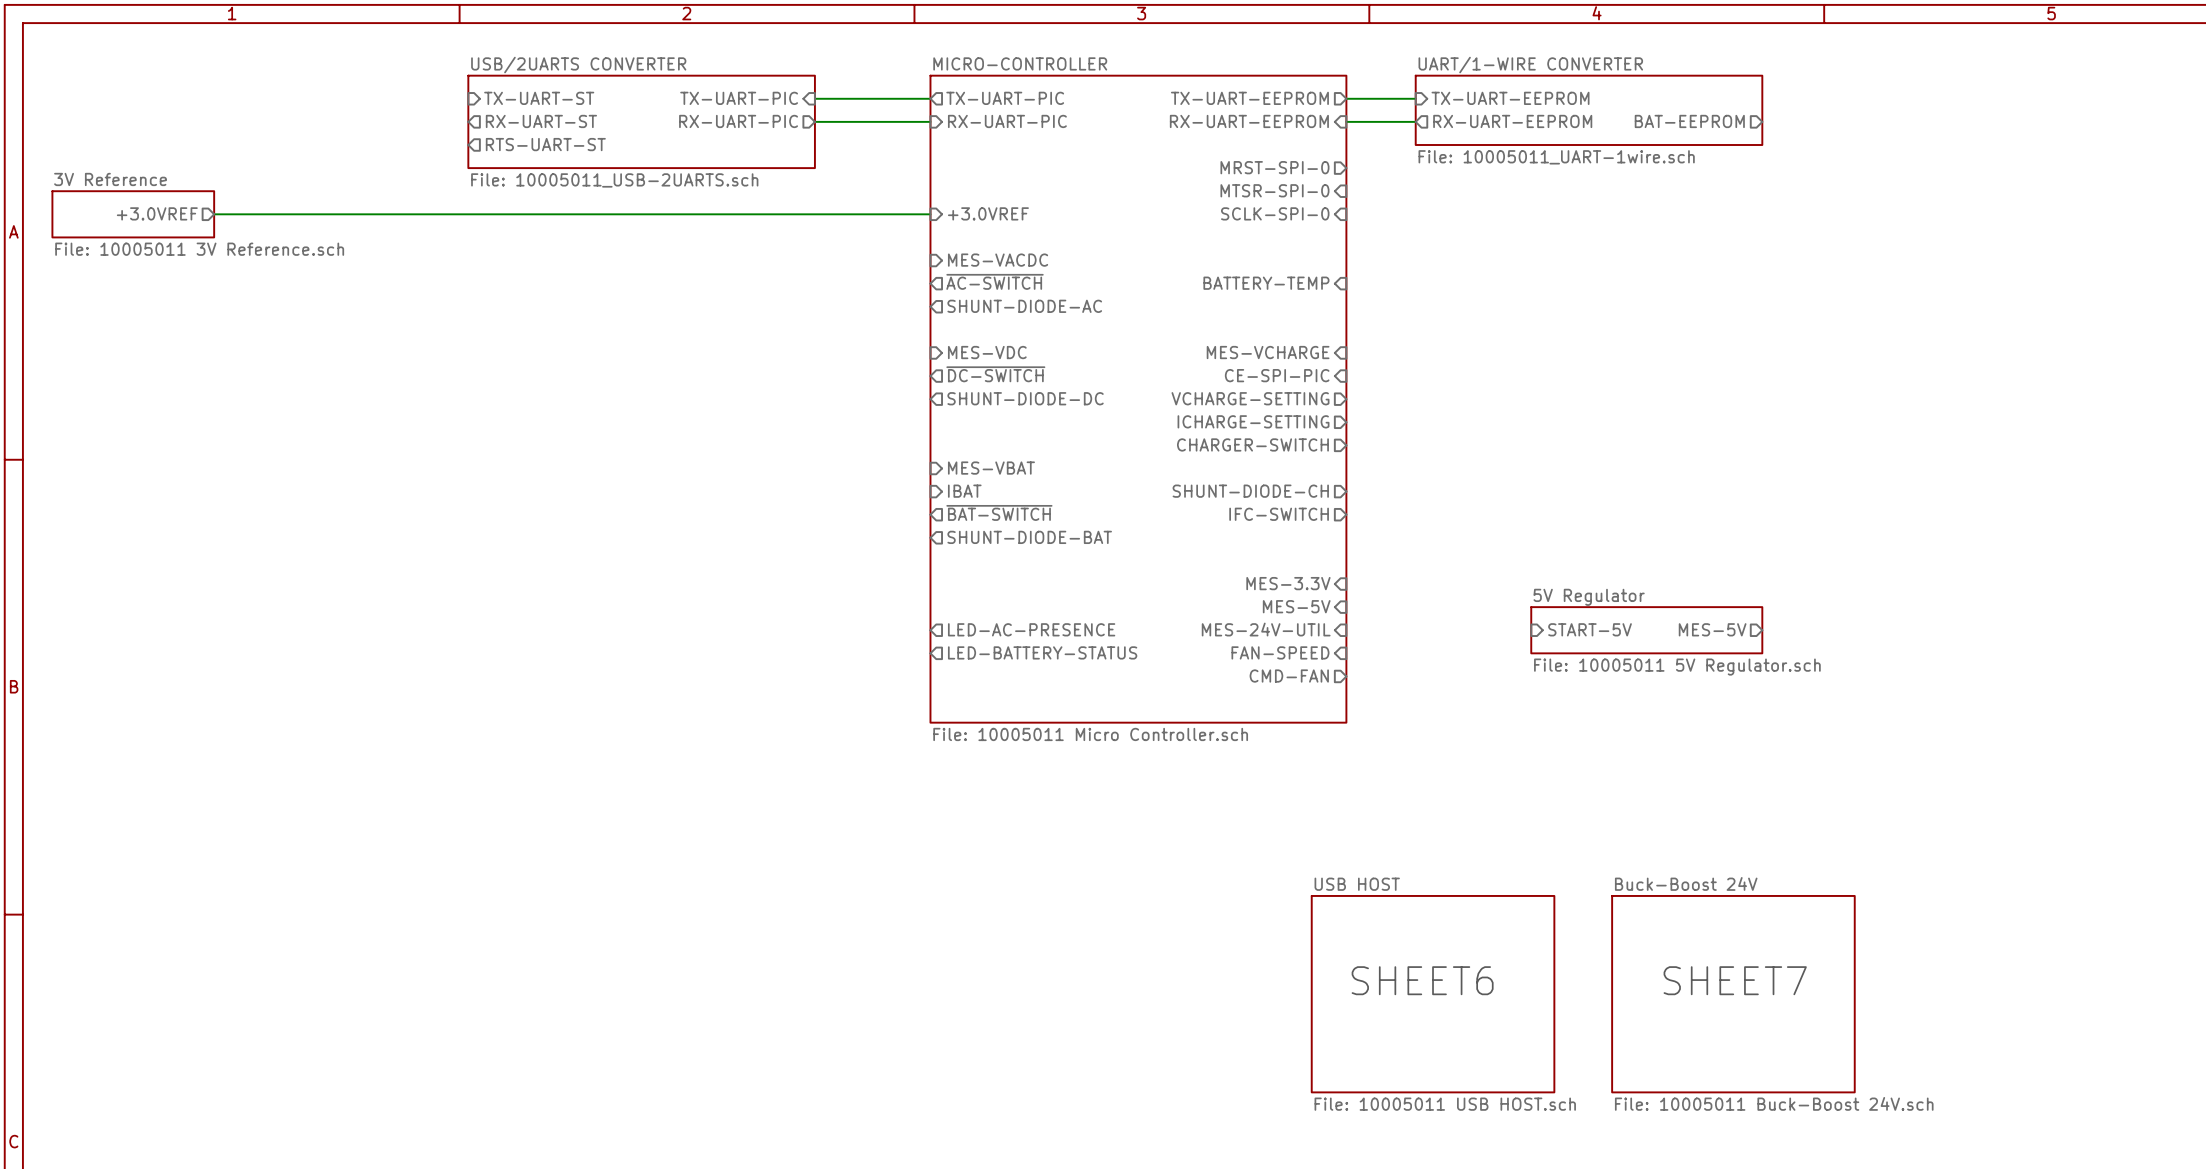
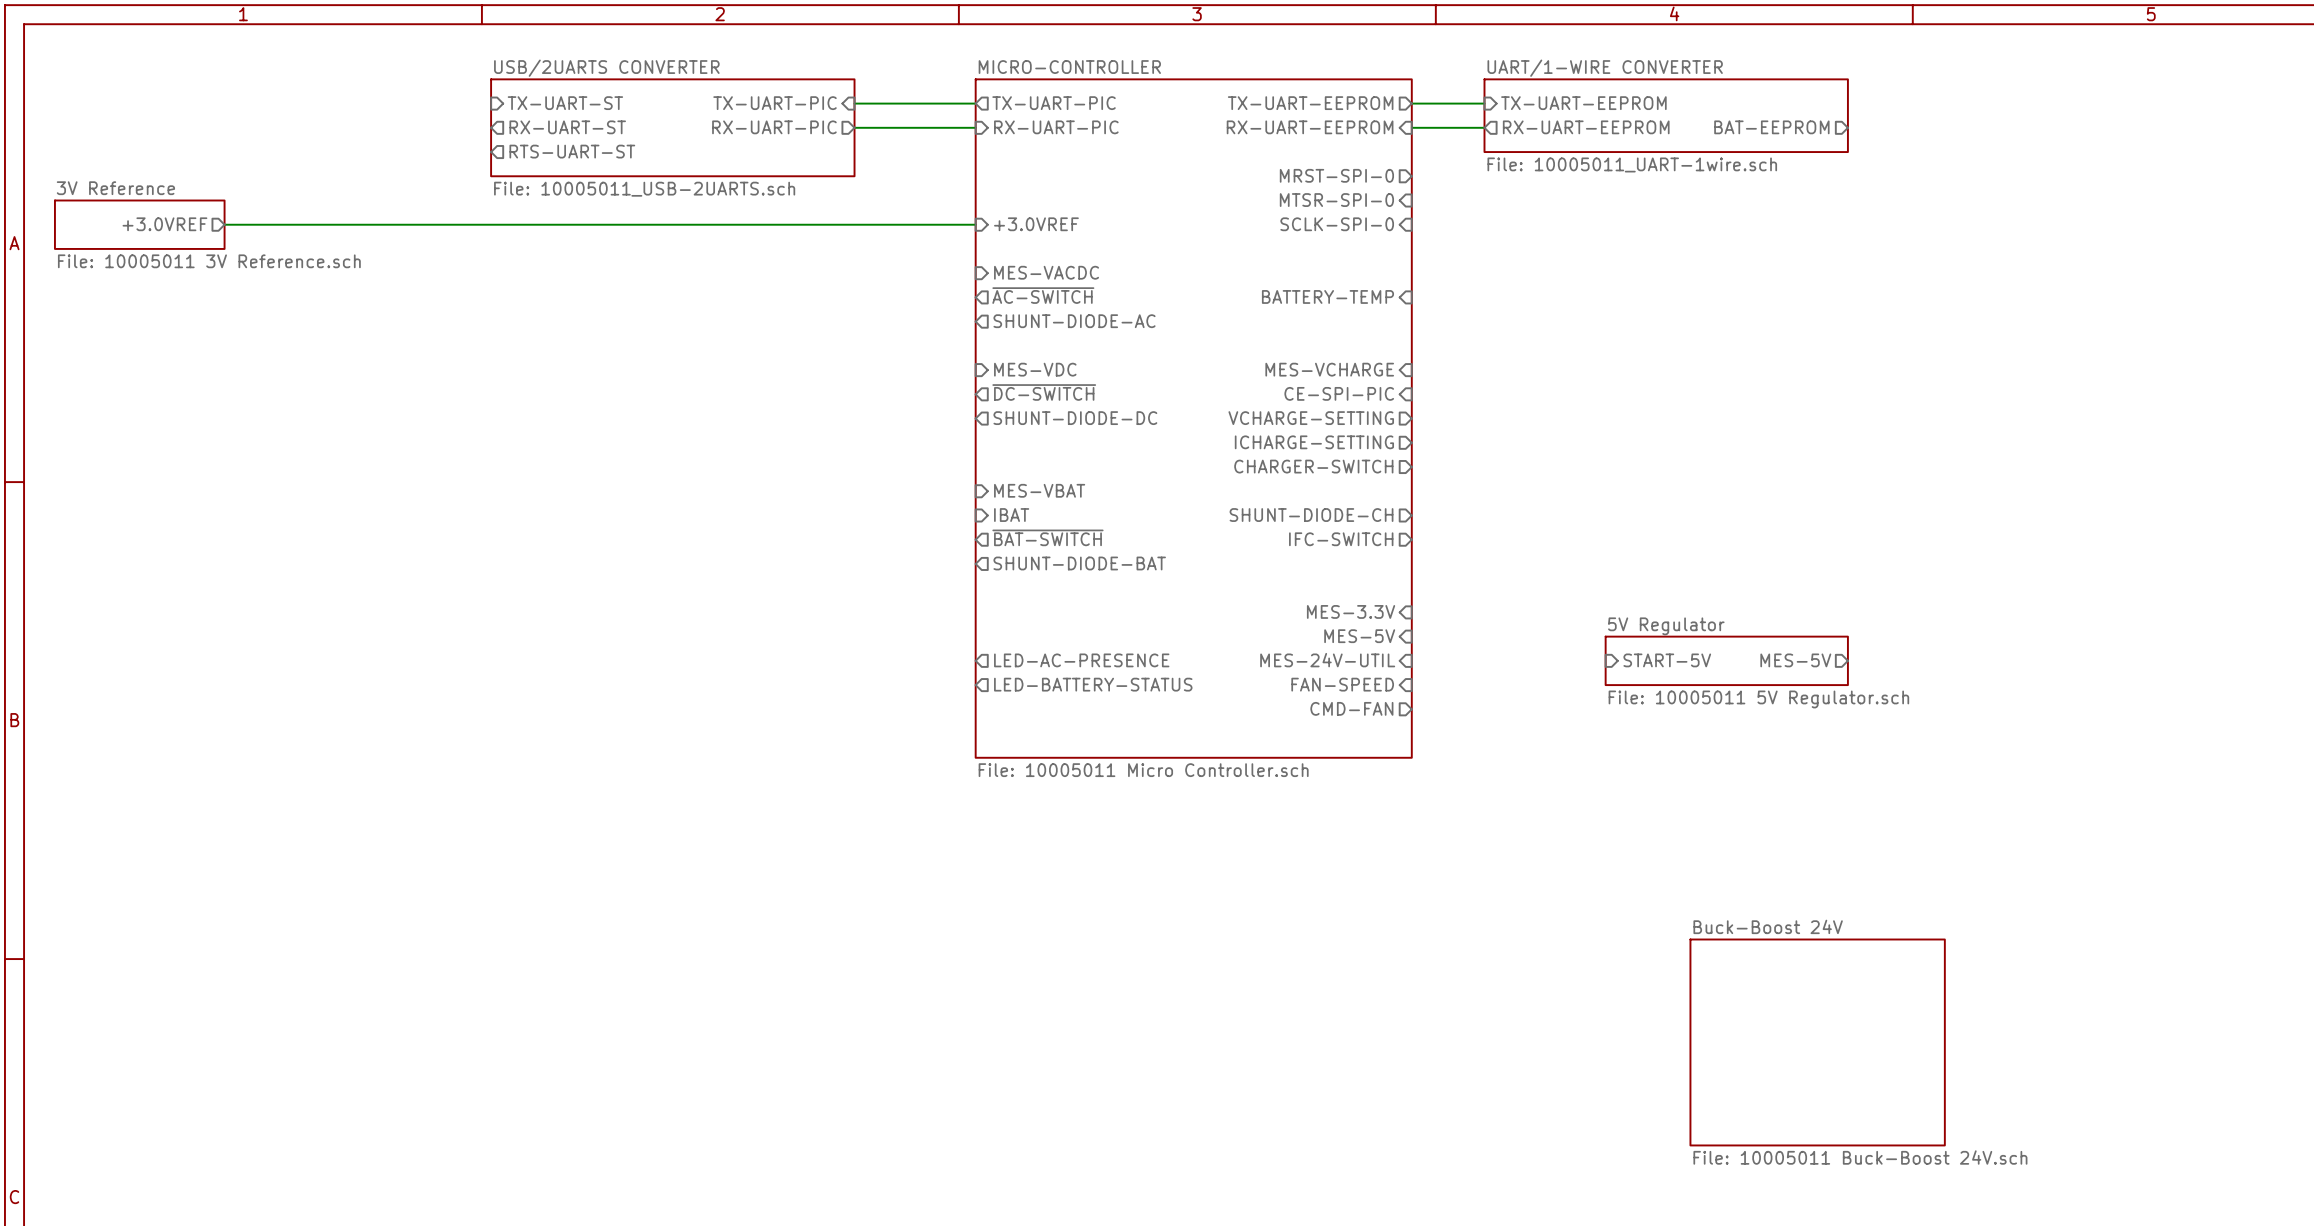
text: SHEET6 (1422, 980) -> none
text: SHEET7 (1735, 980) -> none
sheet USB HOST: File: 10005011 USB HOST.sch (1433, 994) -> none

